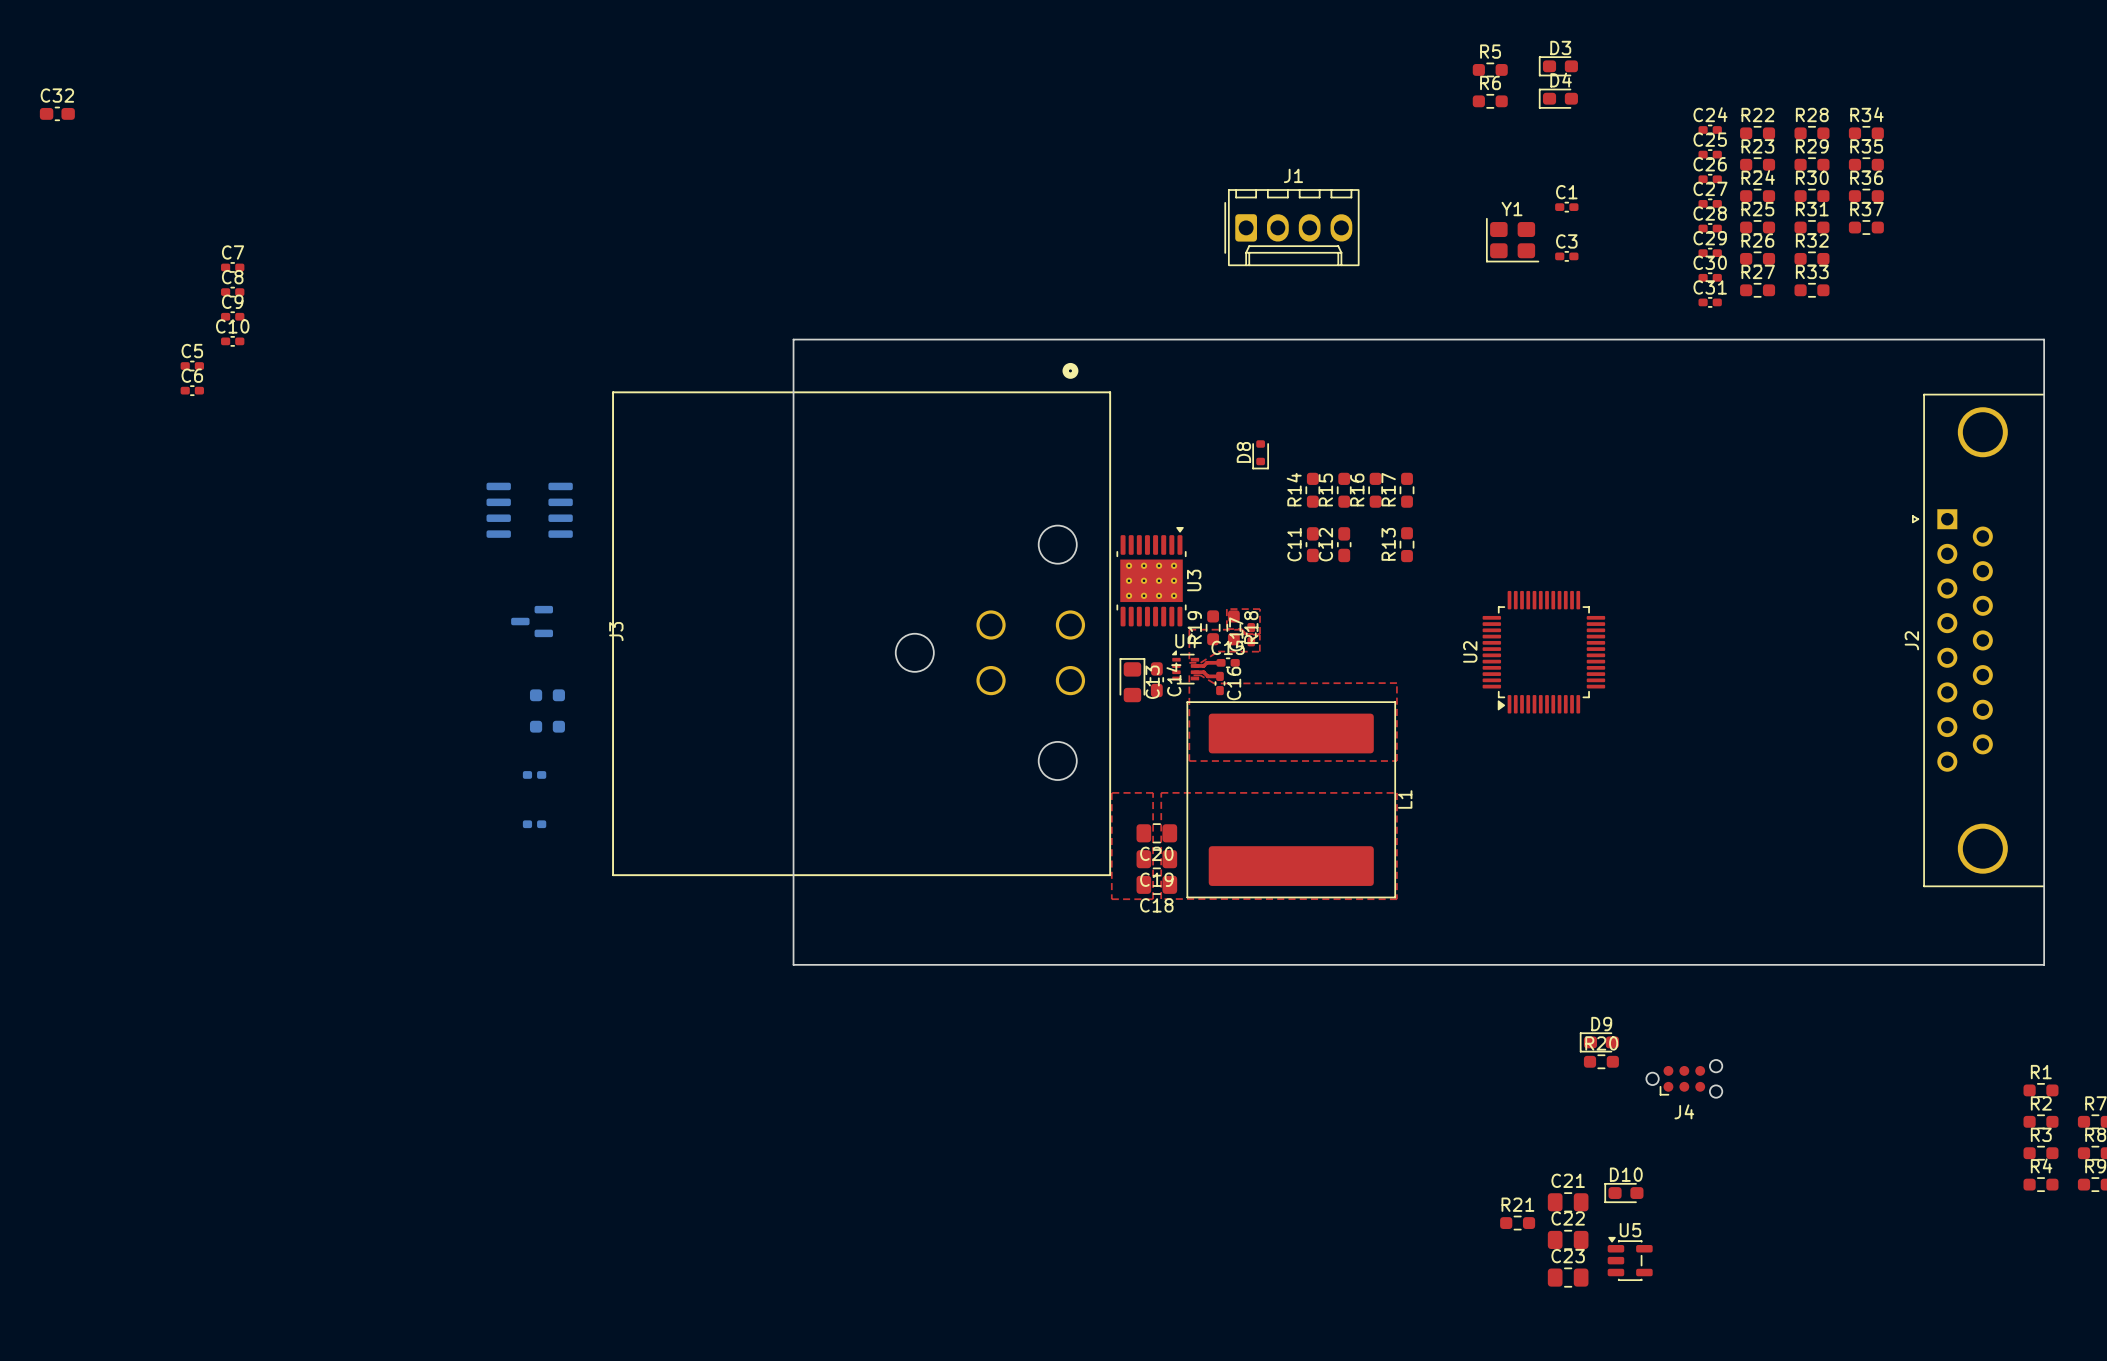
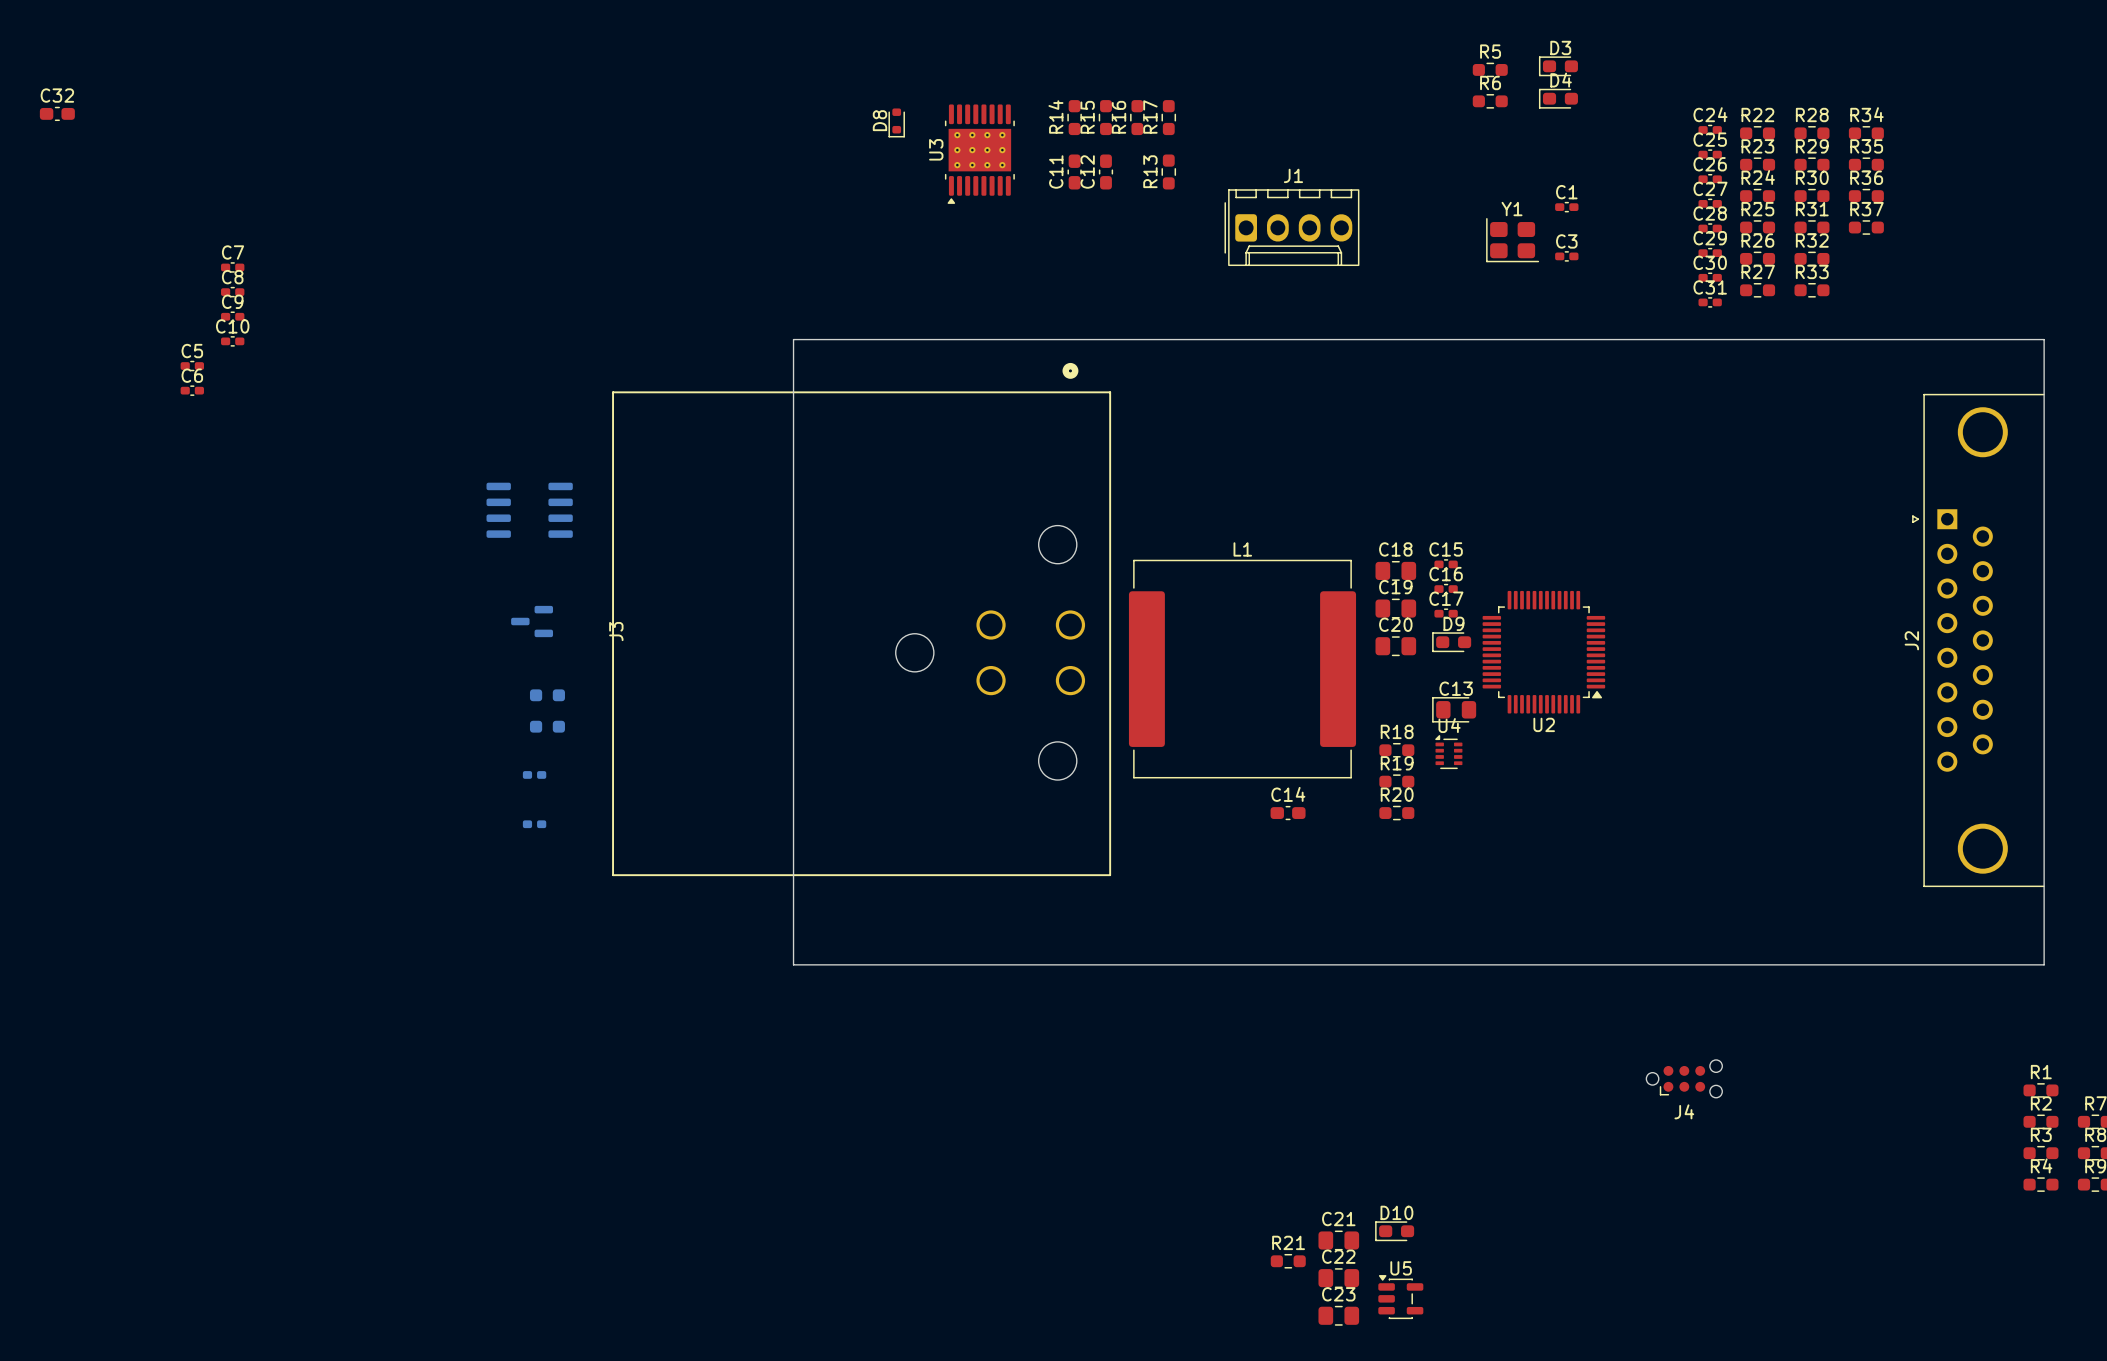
D8 position: (1260, 454) -> (896, 122)
R14 position: (1312, 490) -> (1074, 117)
R15 position: (1344, 490) -> (1105, 117)
R16 position: (1375, 490) -> (1137, 117)
R17 position: (1407, 490) -> (1168, 117)
C11 position: (1312, 544) -> (1074, 171)
C12 position: (1344, 544) -> (1105, 171)
R13 position: (1407, 544) -> (1168, 171)
U3 rotation: 0° (1151, 576) -> 180° (979, 154)
U3 position: (1151, 576) -> (979, 154)
top zone outline: (1226, 609) (1226, 629) (1241, 629) (1246, 634) (1260, 634) (1260, 609) (1226, 609) -> none
R19 rotation: 0° (1213, 627) -> 90° clockwise (1396, 781)
R19 position: (1213, 627) -> (1396, 781)
R18 rotation: 0° (1233, 627) -> 90° clockwise (1396, 750)
R18 position: (1233, 627) -> (1396, 750)
R18 name position: R18 (1251, 627) -> R18 (1397, 731)
top zone outline: (1189, 629) (1241, 629) (1245, 634) (1259, 634) (1259, 651) (1218, 651) (1200, 662) (1189, 662) (1189, 629) -> none
C17 rotation: 0° (1251, 634) -> 90° clockwise (1446, 613)
C17 position: (1251, 634) -> (1446, 613)
U2 rotation: 0° (1543, 652) -> 90° counterclockwise (1543, 652)
top track: (1221, 662) (1206, 662) (1203, 665) (1194, 665) -> none
C15 position: (1228, 662) -> (1446, 564)
U4 position: (1185, 667) -> (1448, 752)
top track: (1194, 672) (1203, 672) (1207, 676) (1219, 676) -> none
top zone outline: (1189, 675) (1200, 675) (1214, 683) (1396, 683) (1396, 761) (1189, 761) (1189, 675) -> none
C14 rotation: 0° (1156, 679) -> 90° clockwise (1288, 813)
C14 position: (1156, 679) -> (1288, 813)
C14 name position: C14 (1173, 679) -> C14 (1288, 794)
C13 rotation: 0° (1132, 680) -> 90° counterclockwise (1454, 709)
C13 position: (1132, 680) -> (1454, 709)
C16 rotation: 0° (1219, 683) -> 90° clockwise (1446, 589)
C16 position: (1219, 683) -> (1446, 589)
L1 footprint: [1186, 701, 1396, 899] -> [1128, 559, 1357, 779]
top zone outline: (1111, 792) (1153, 792) (1153, 899) (1111, 899) (1111, 792) -> none
top zone outline: (1161, 792) (1161, 899) (1396, 899) (1396, 792) (1161, 792) -> none
L1 name position: L1 (1405, 799) -> L1 (1242, 549)
C20 position: (1156, 833) -> (1395, 646)
C20 name position: C20 (1156, 853) -> C20 (1395, 624)
C19 position: (1156, 859) -> (1395, 608)
C19 name position: C19 (1156, 879) -> C19 (1395, 587)
C18 position: (1156, 884) -> (1395, 570)
C18 name position: C18 (1156, 905) -> C18 (1395, 549)
D9 position: (1599, 1042) -> (1451, 642)
R20 position: (1601, 1061) -> (1396, 813)
D10 position: (1623, 1193) -> (1394, 1231)
C21 position: (1568, 1202) -> (1338, 1240)
R21 position: (1517, 1223) -> (1288, 1261)
C22 position: (1568, 1239) -> (1338, 1278)
U5 position: (1630, 1258) -> (1400, 1297)
C23 position: (1568, 1277) -> (1338, 1315)

